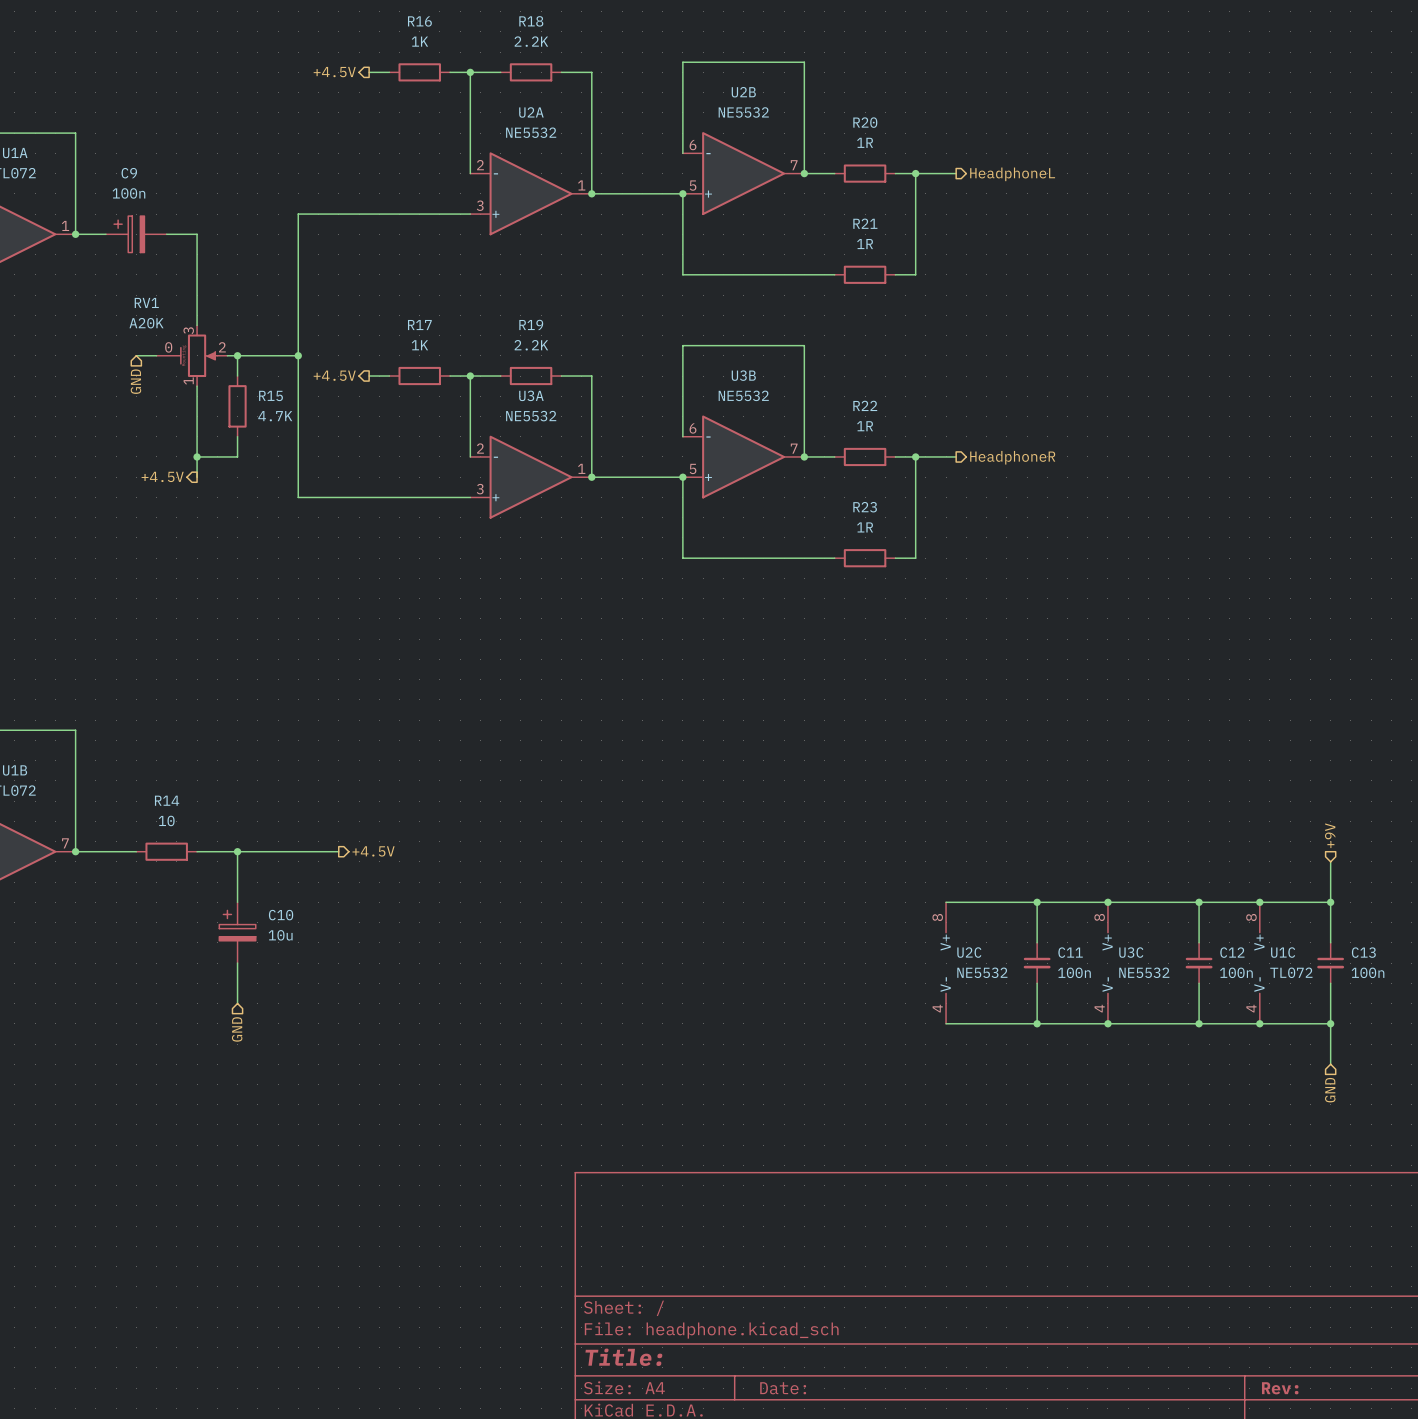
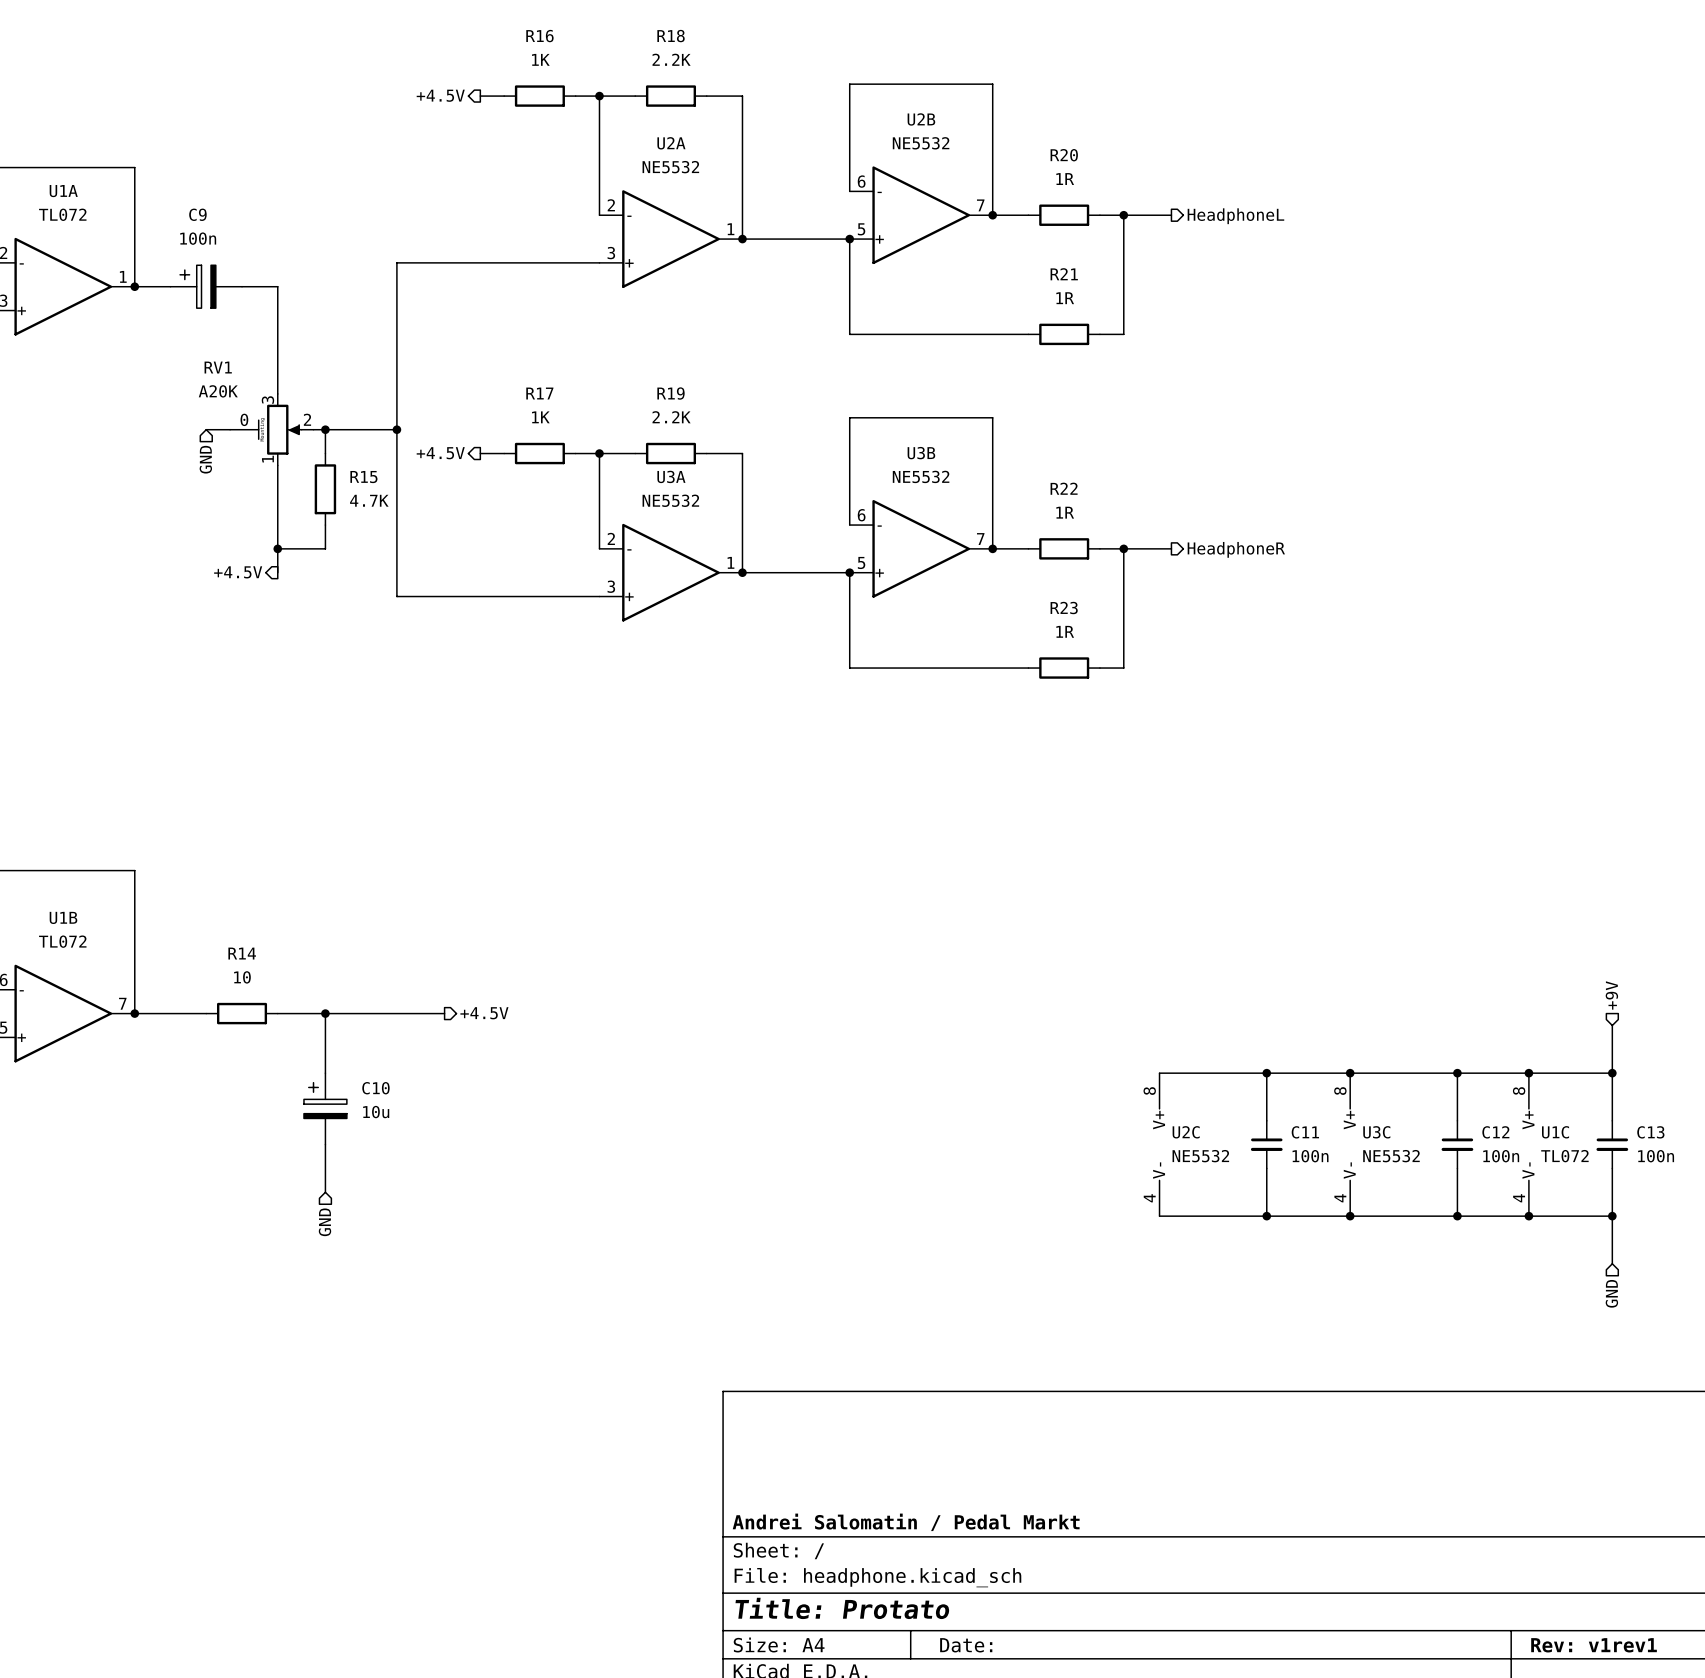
title block: none -> Andrei Salomatin / Pedal Markt (906, 1522)
title block: Title: (623, 1357) -> Title: Protato (842, 1608)
title block: Rev: (1280, 1388) -> Rev: v1rev1 (1594, 1645)

